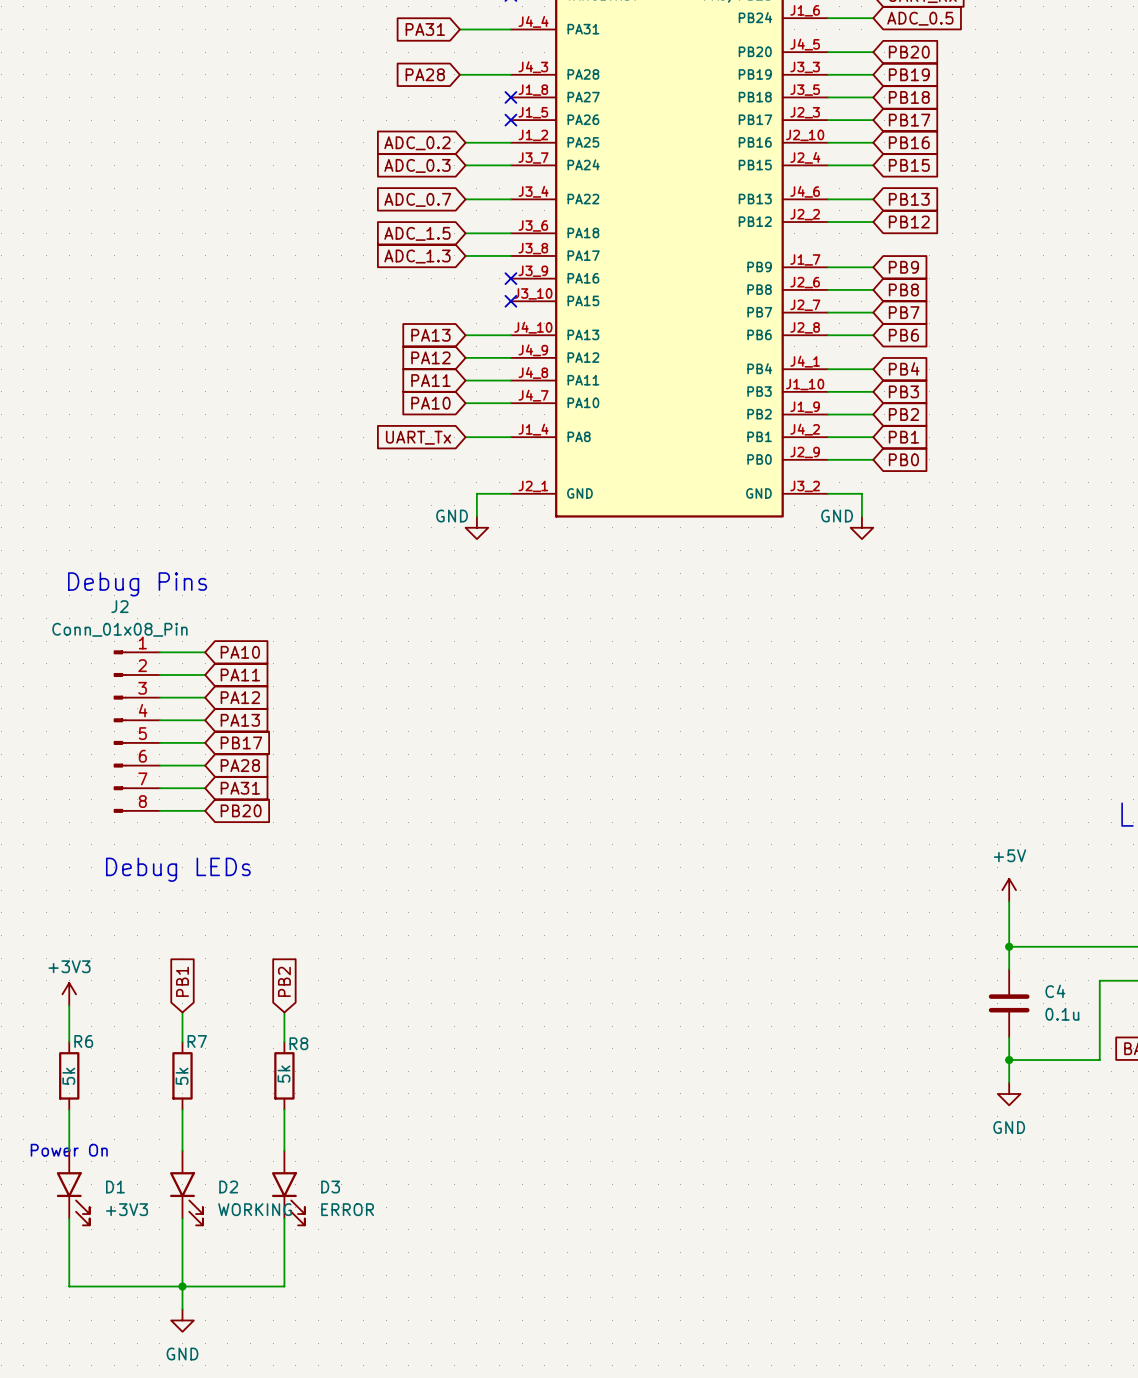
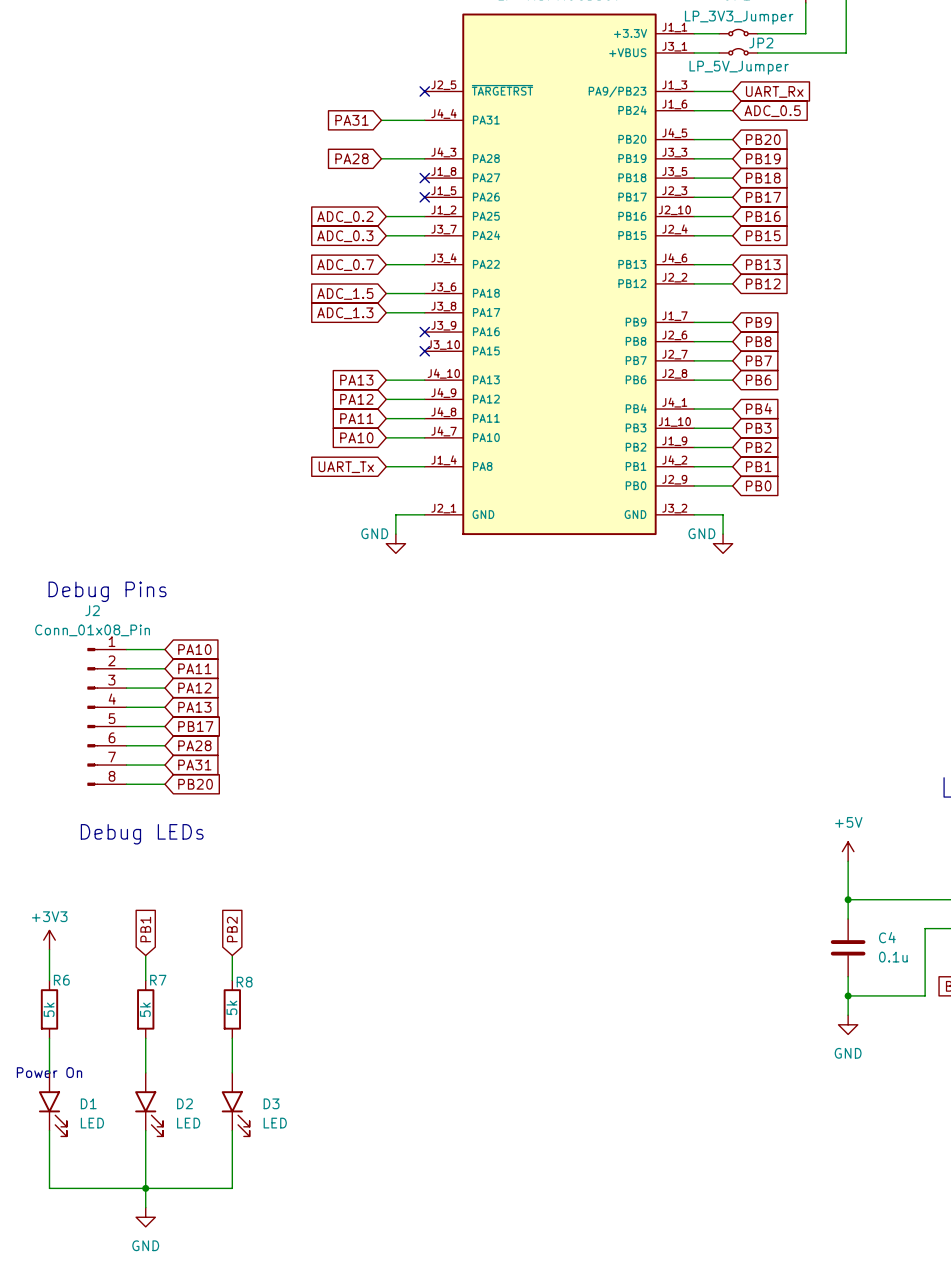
D1 value: +3V3 (127, 1209) -> LED (92, 1123)
D2 value: WORKING (255, 1209) -> LED (188, 1123)
D3 value: ERROR (347, 1209) -> LED (275, 1123)

